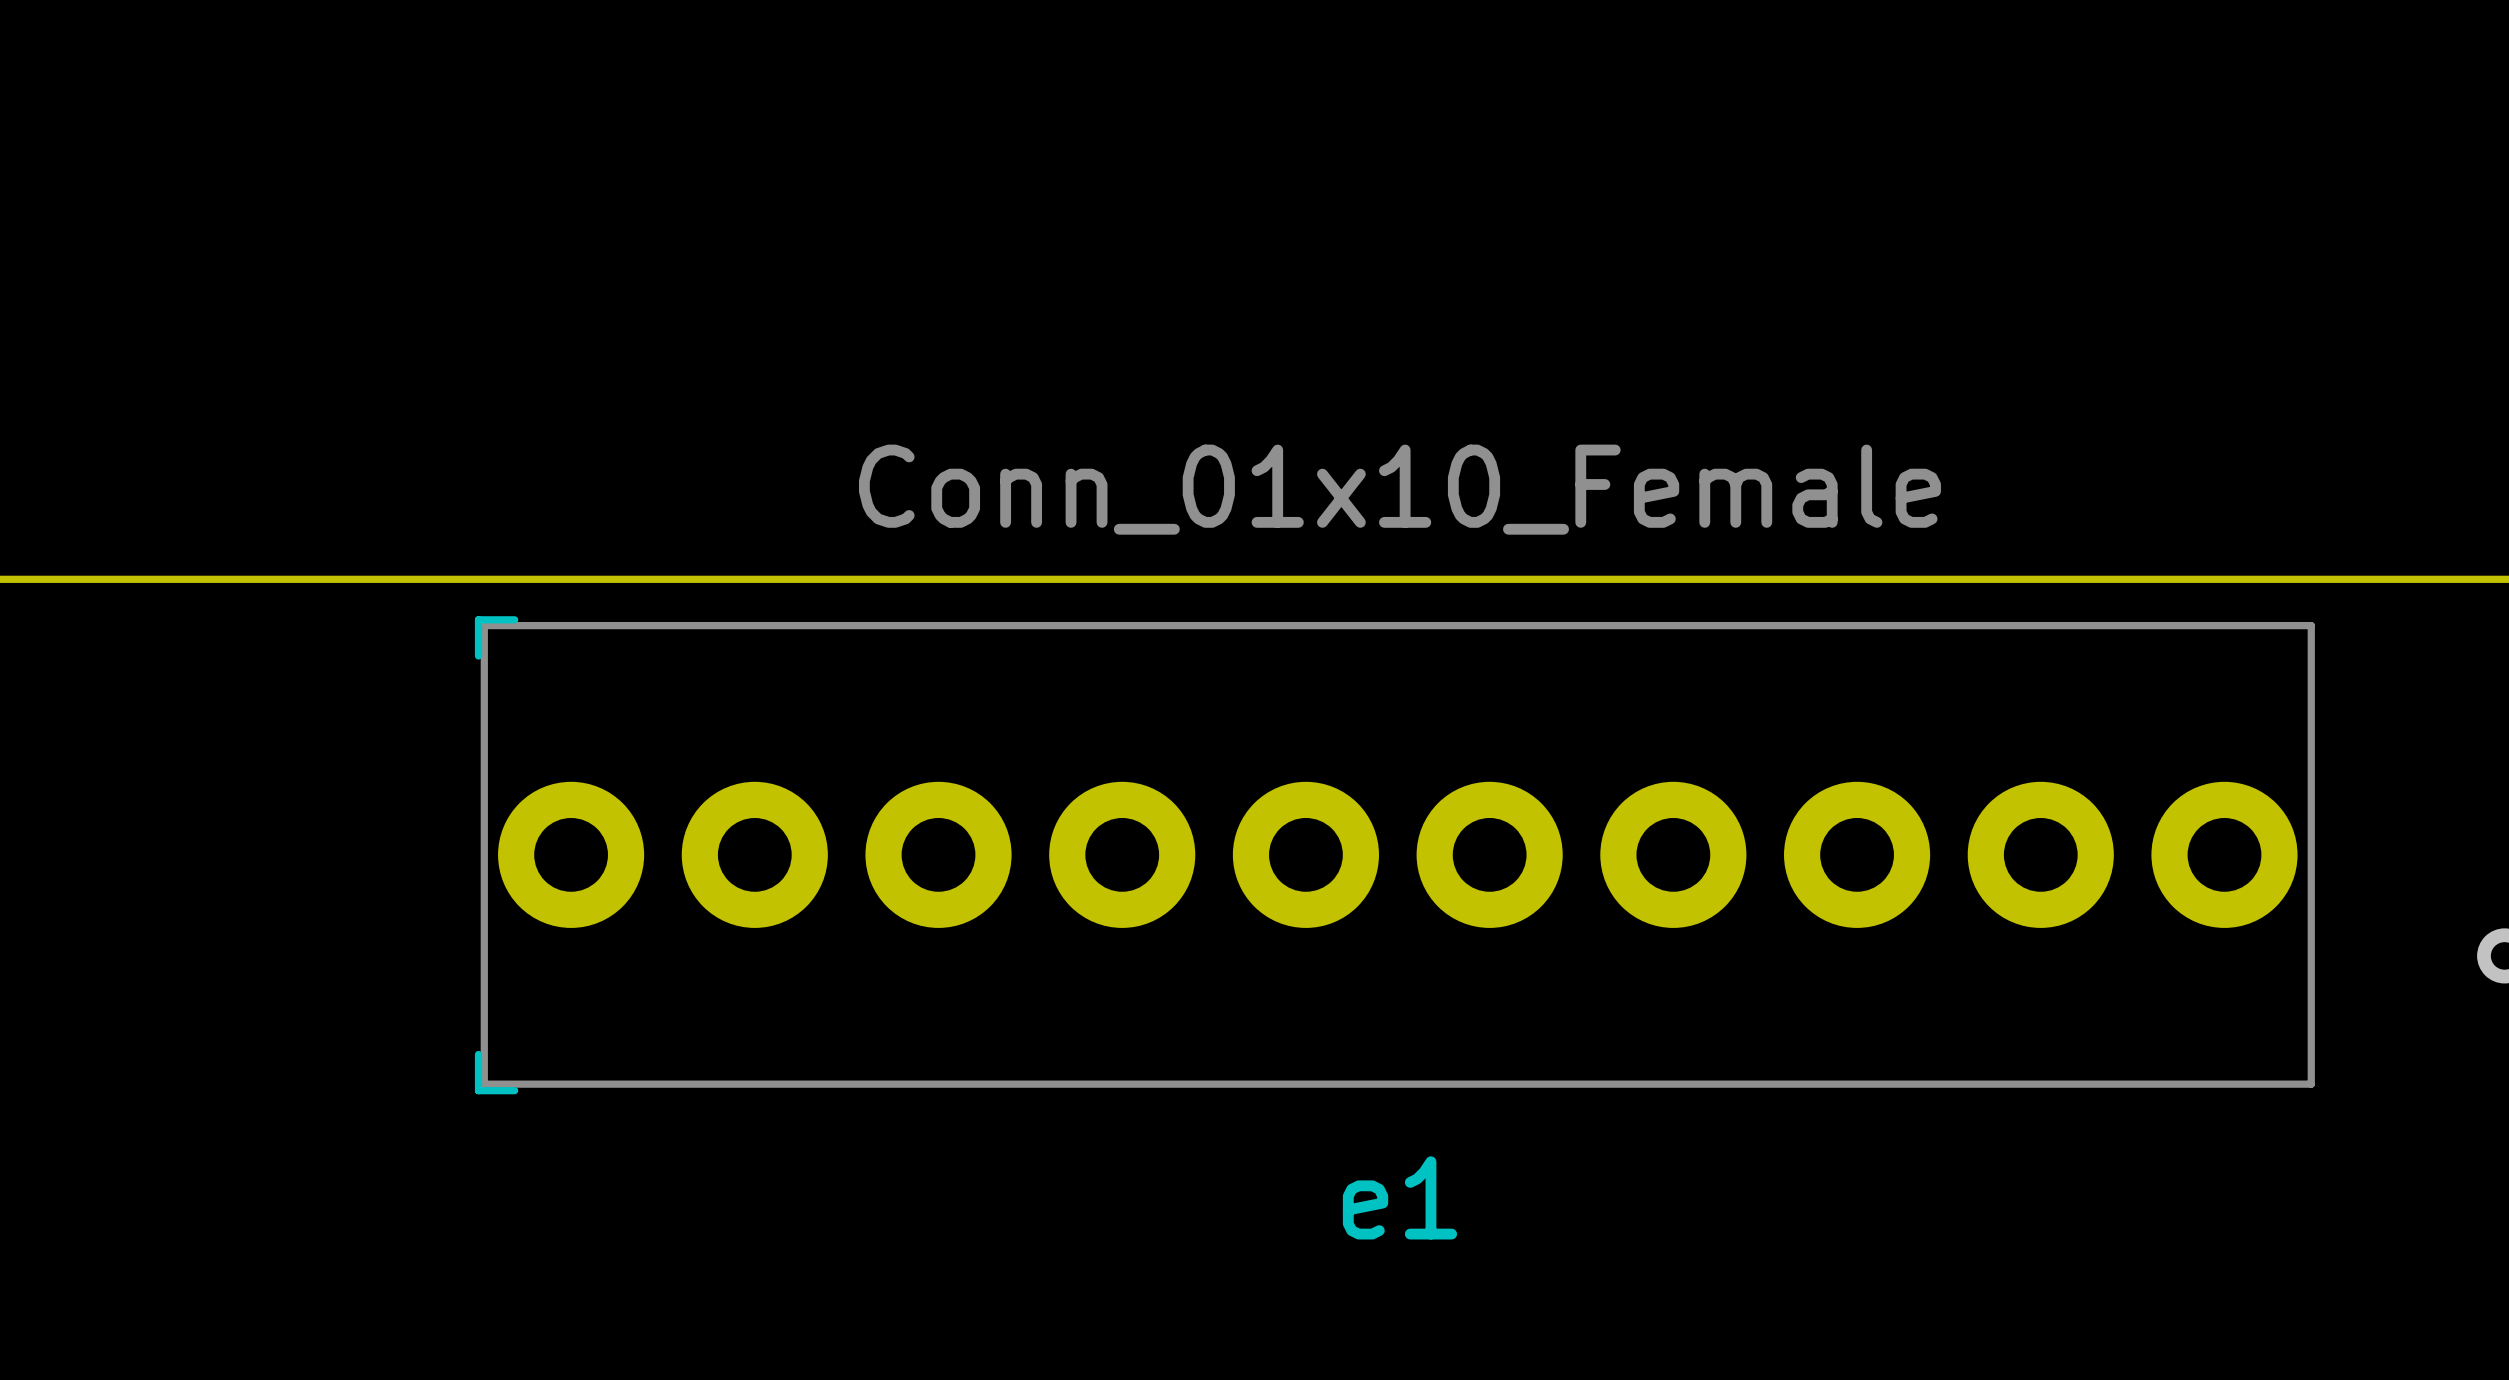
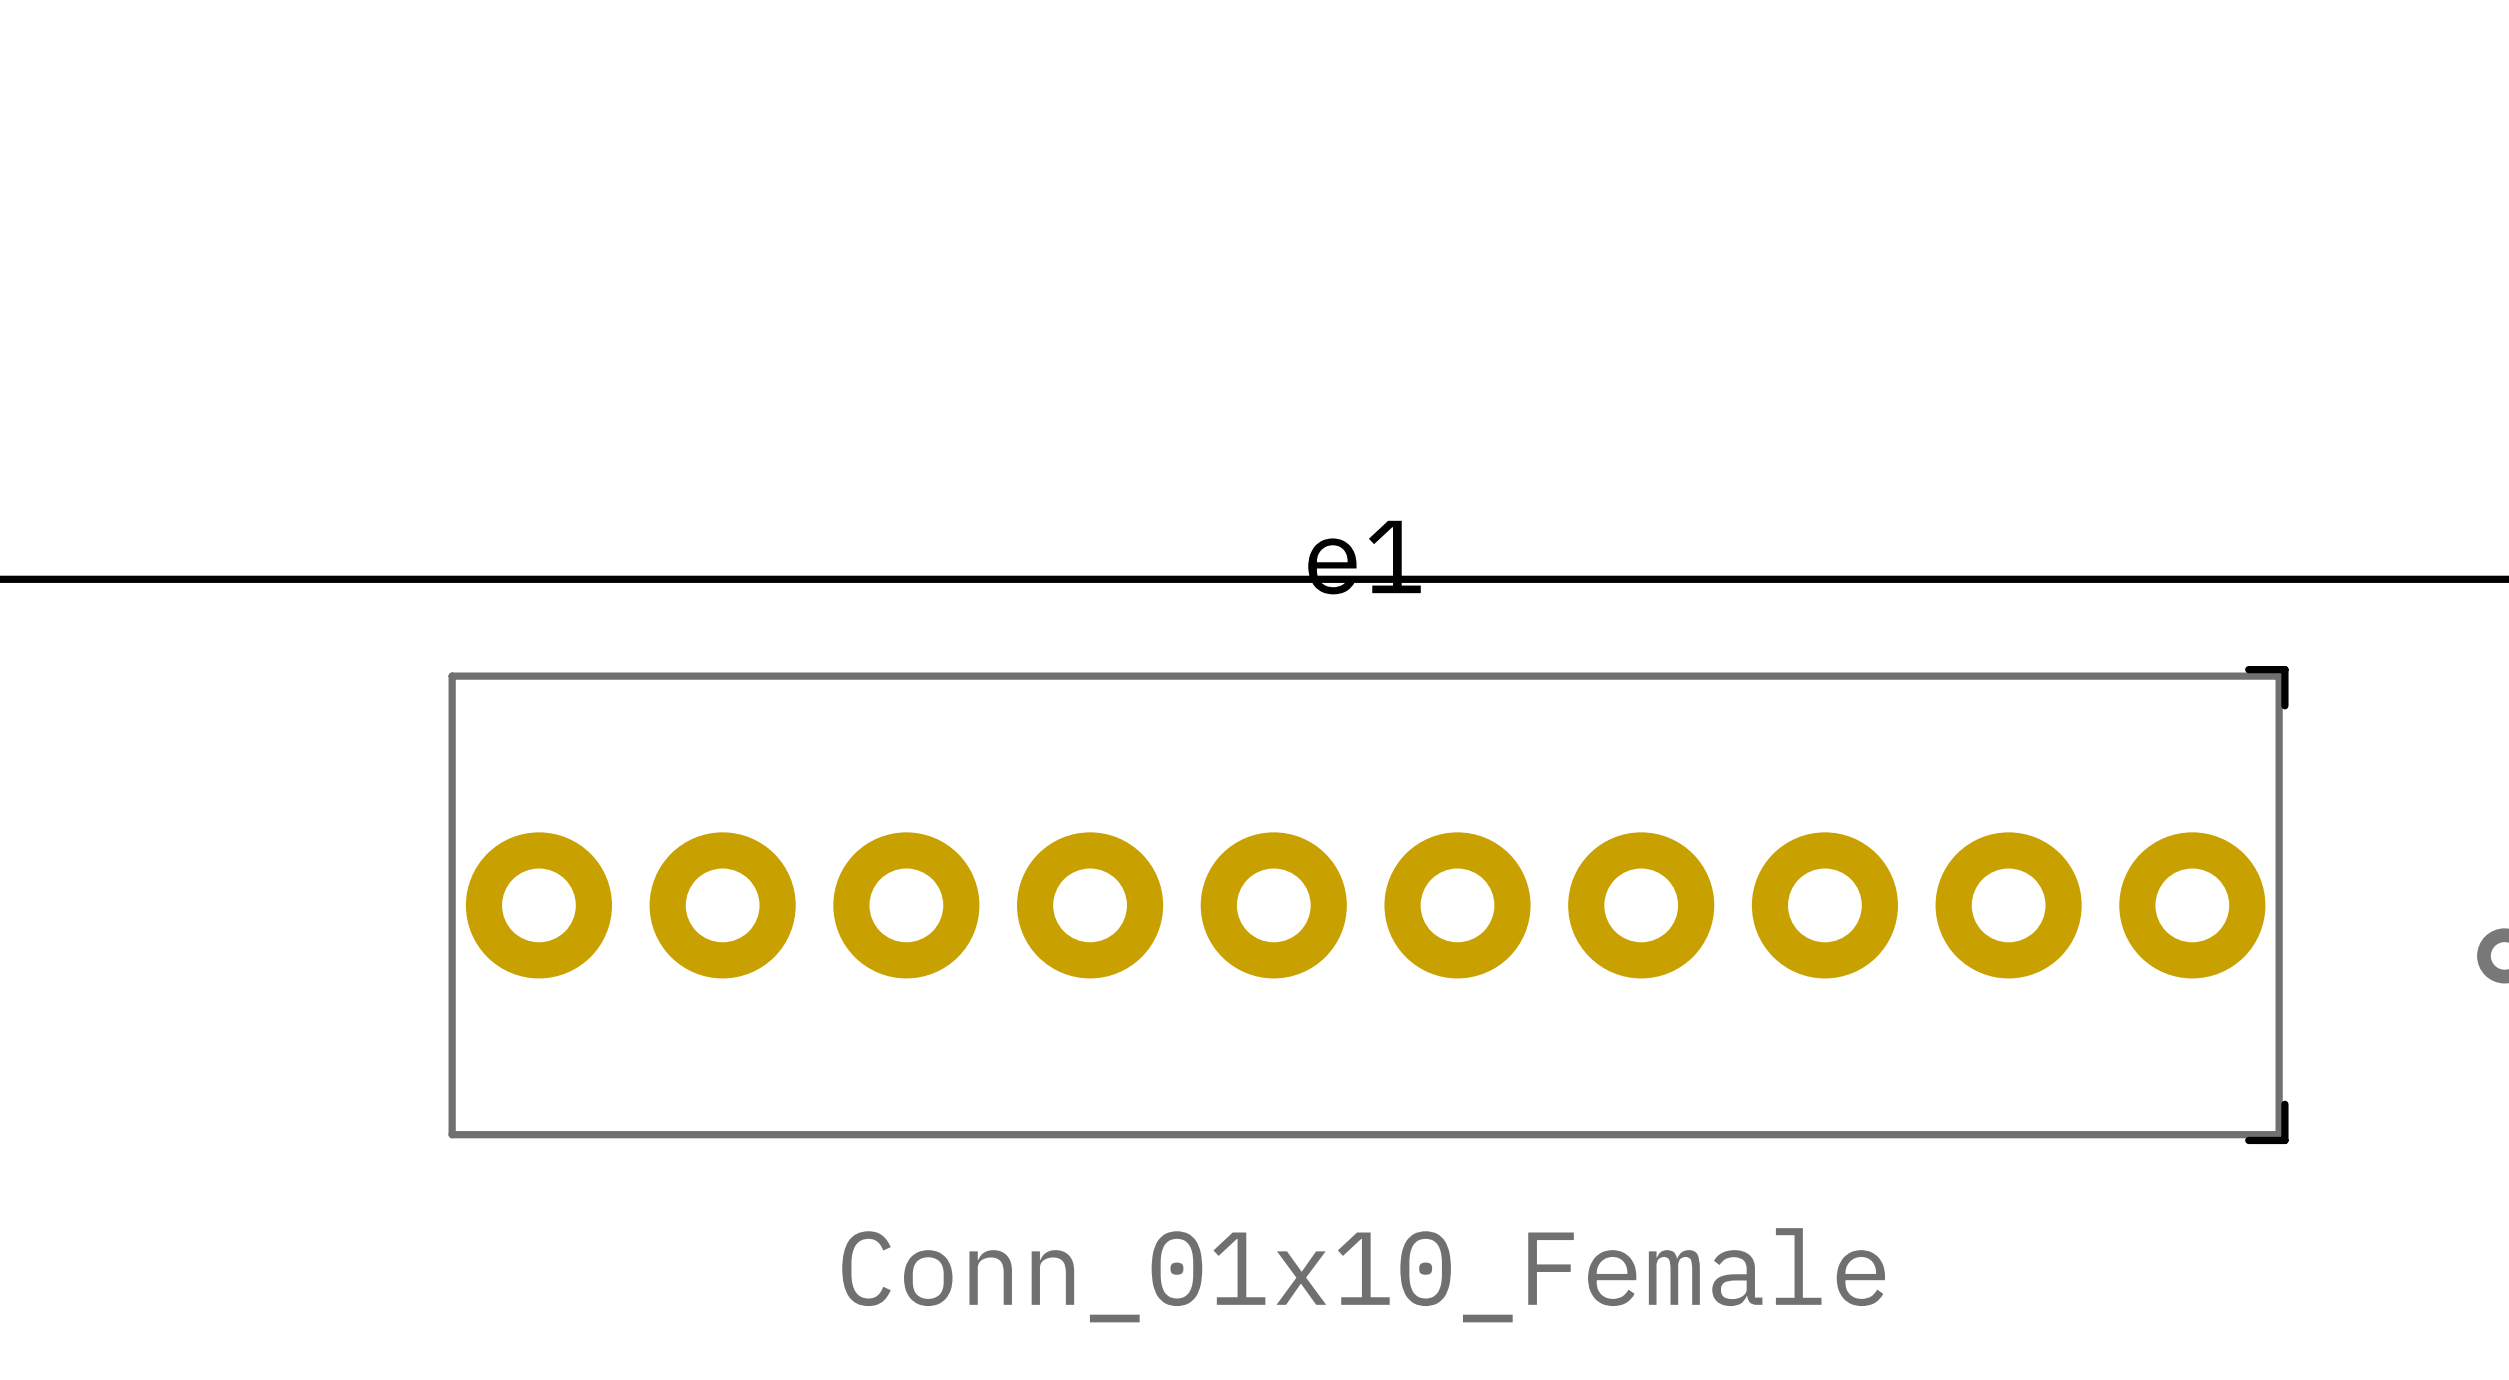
e1 rotation: 0° (1394, 855) -> 180° (1368, 905)

